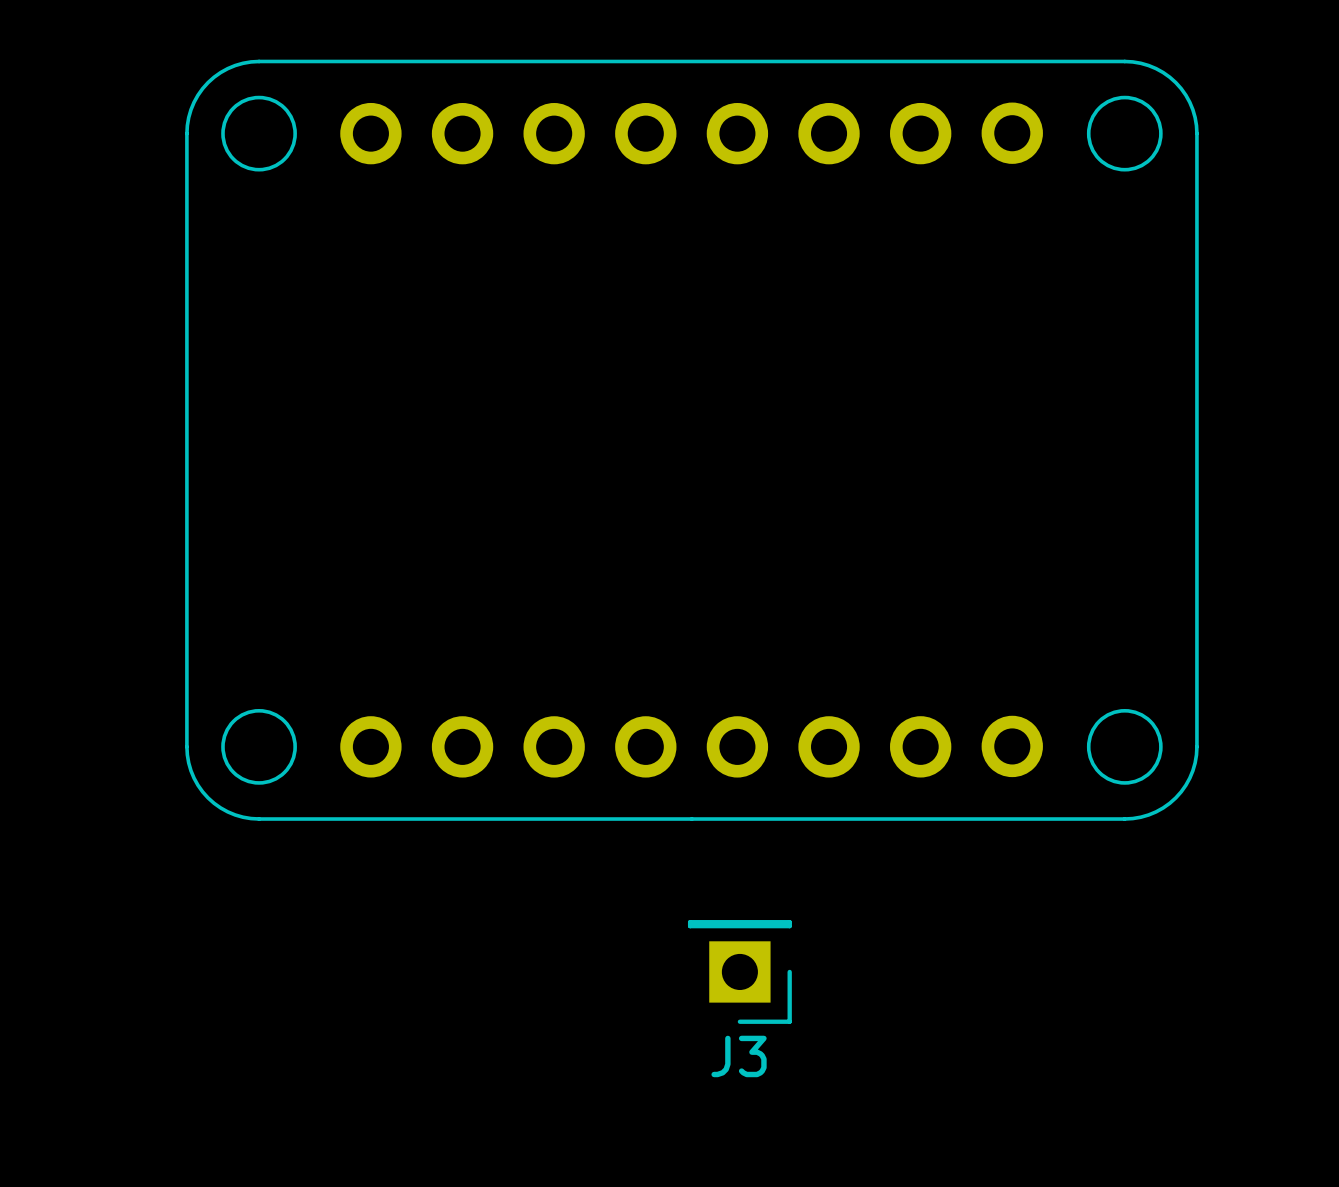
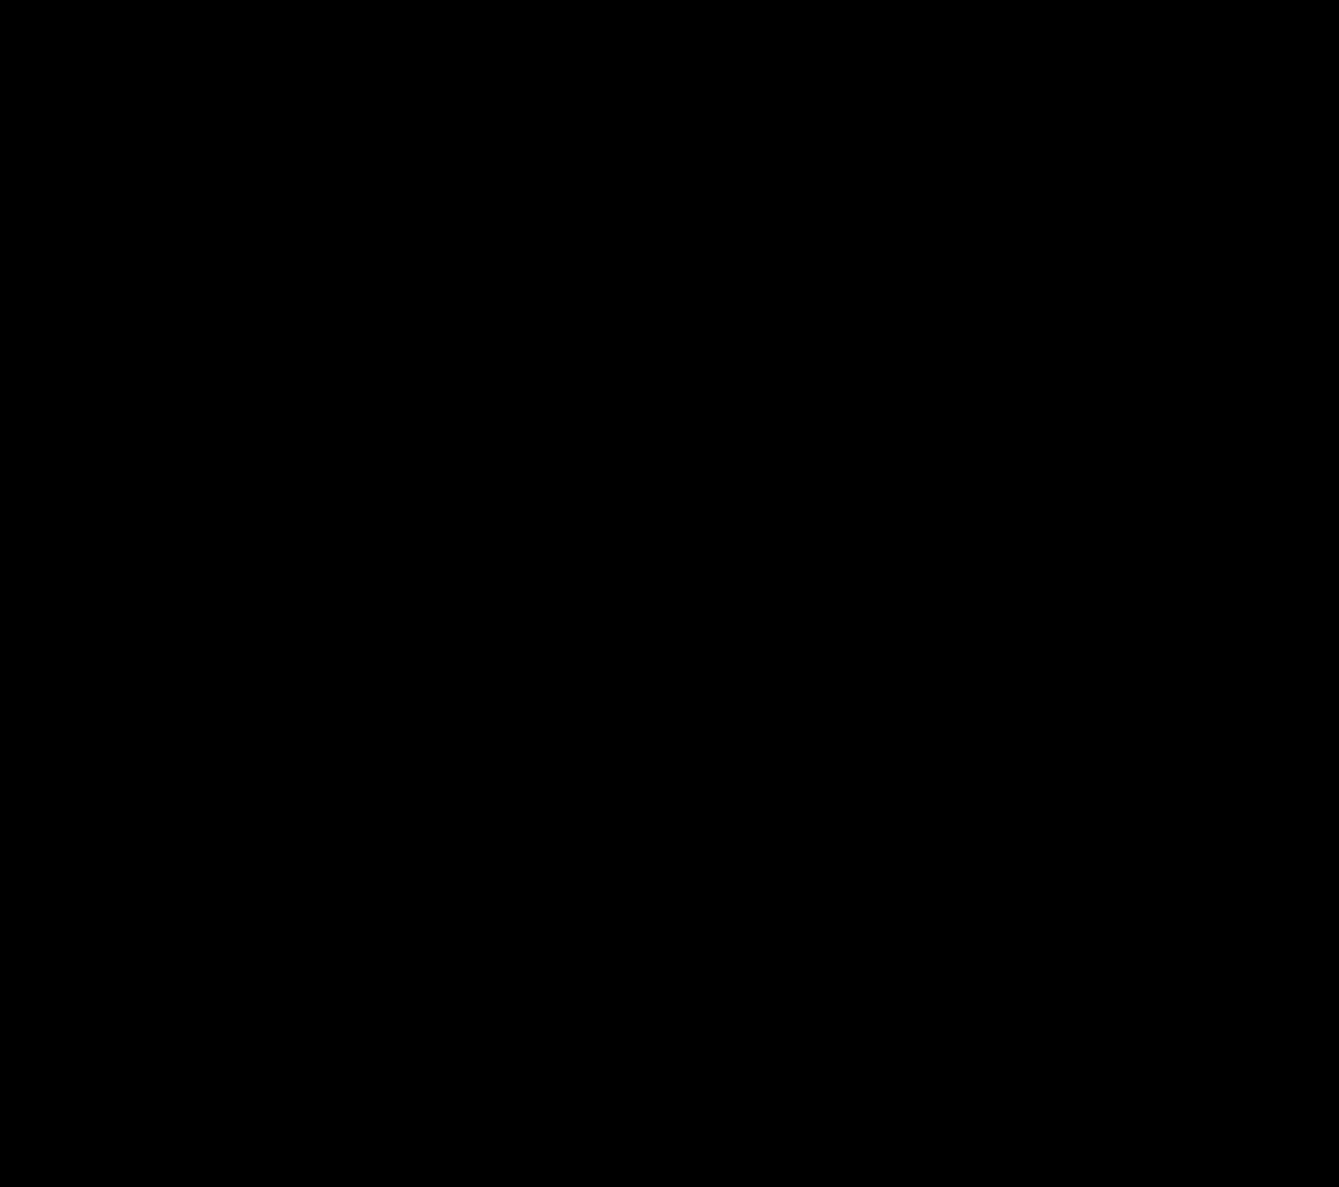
part: (691, 440) -> none
J3: (739, 971) -> none

